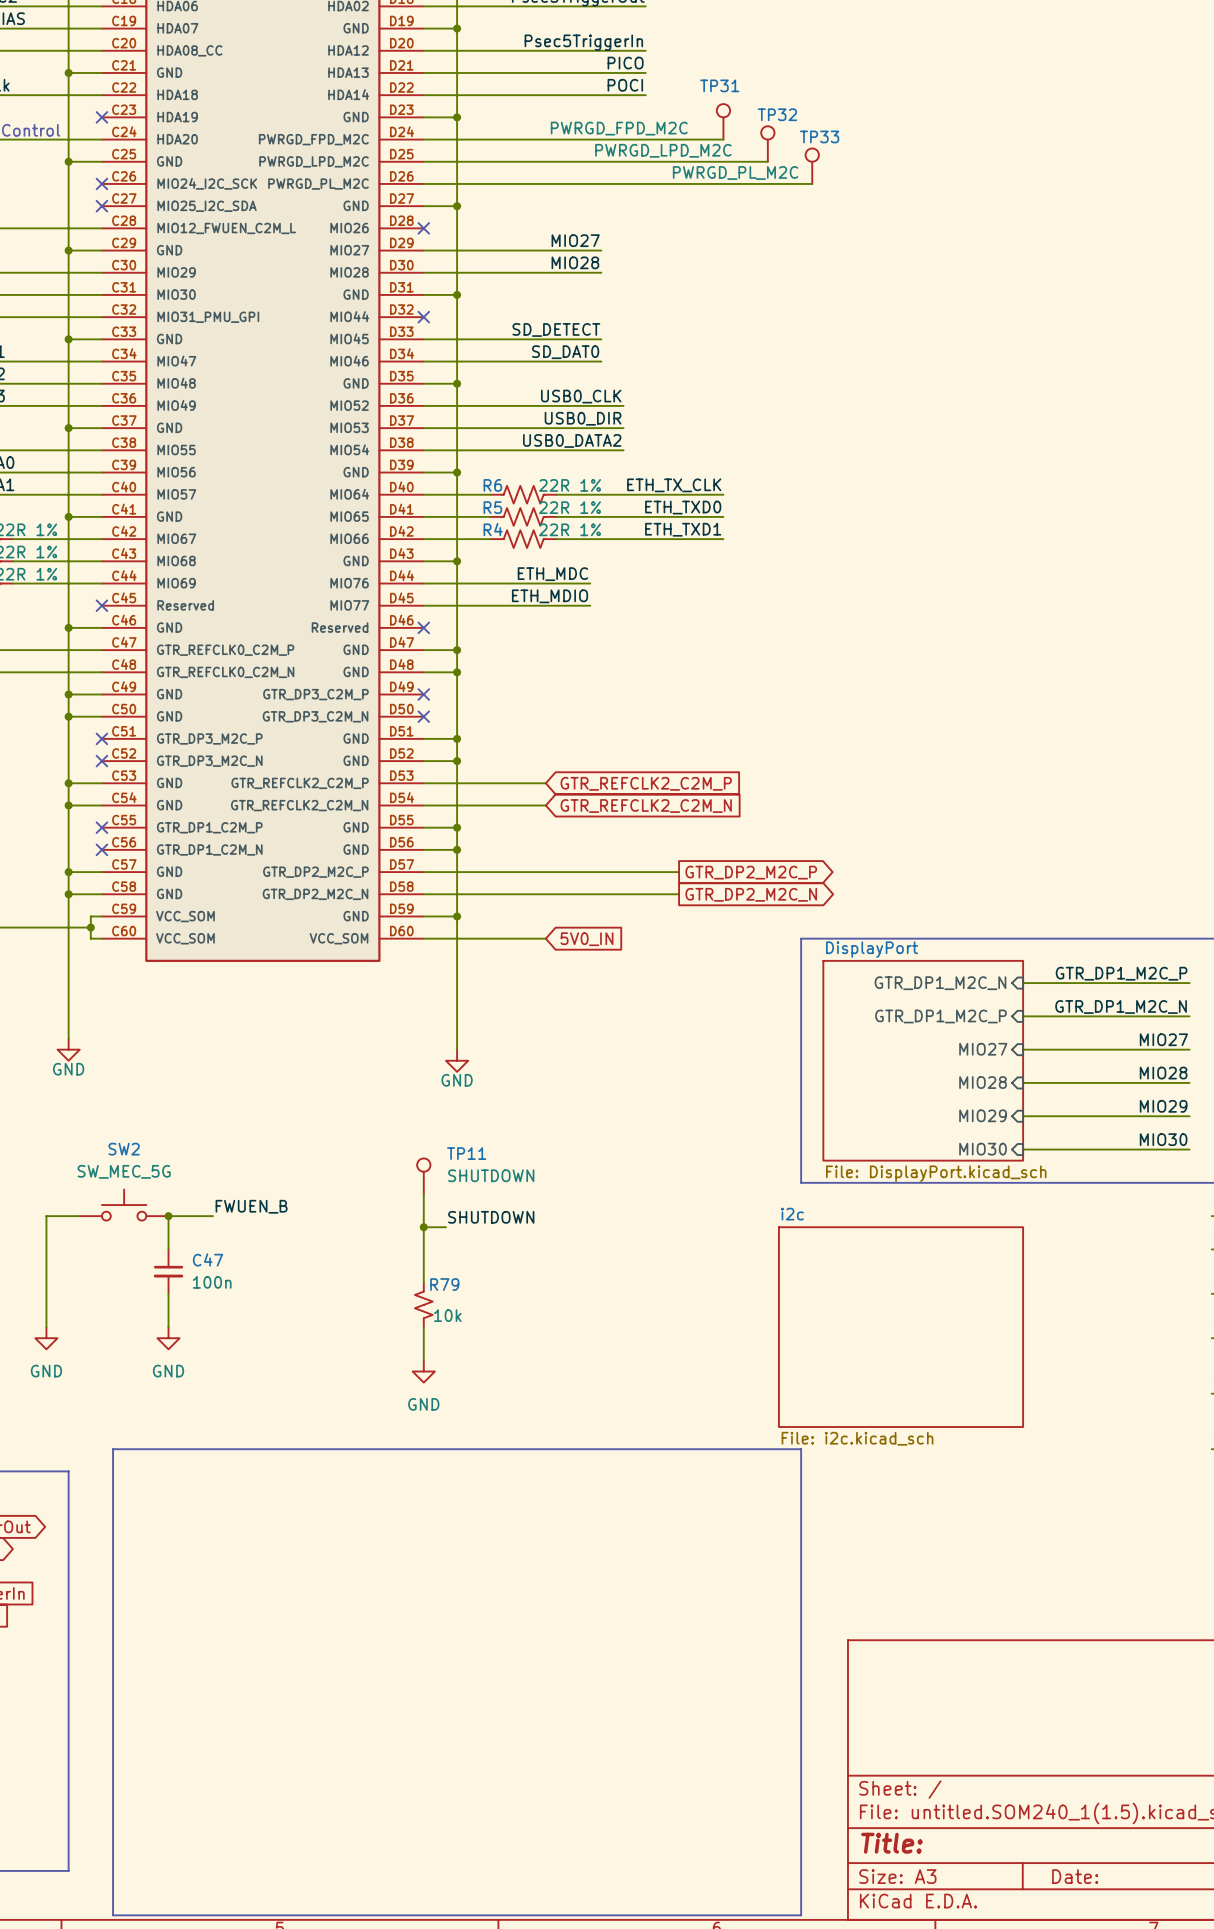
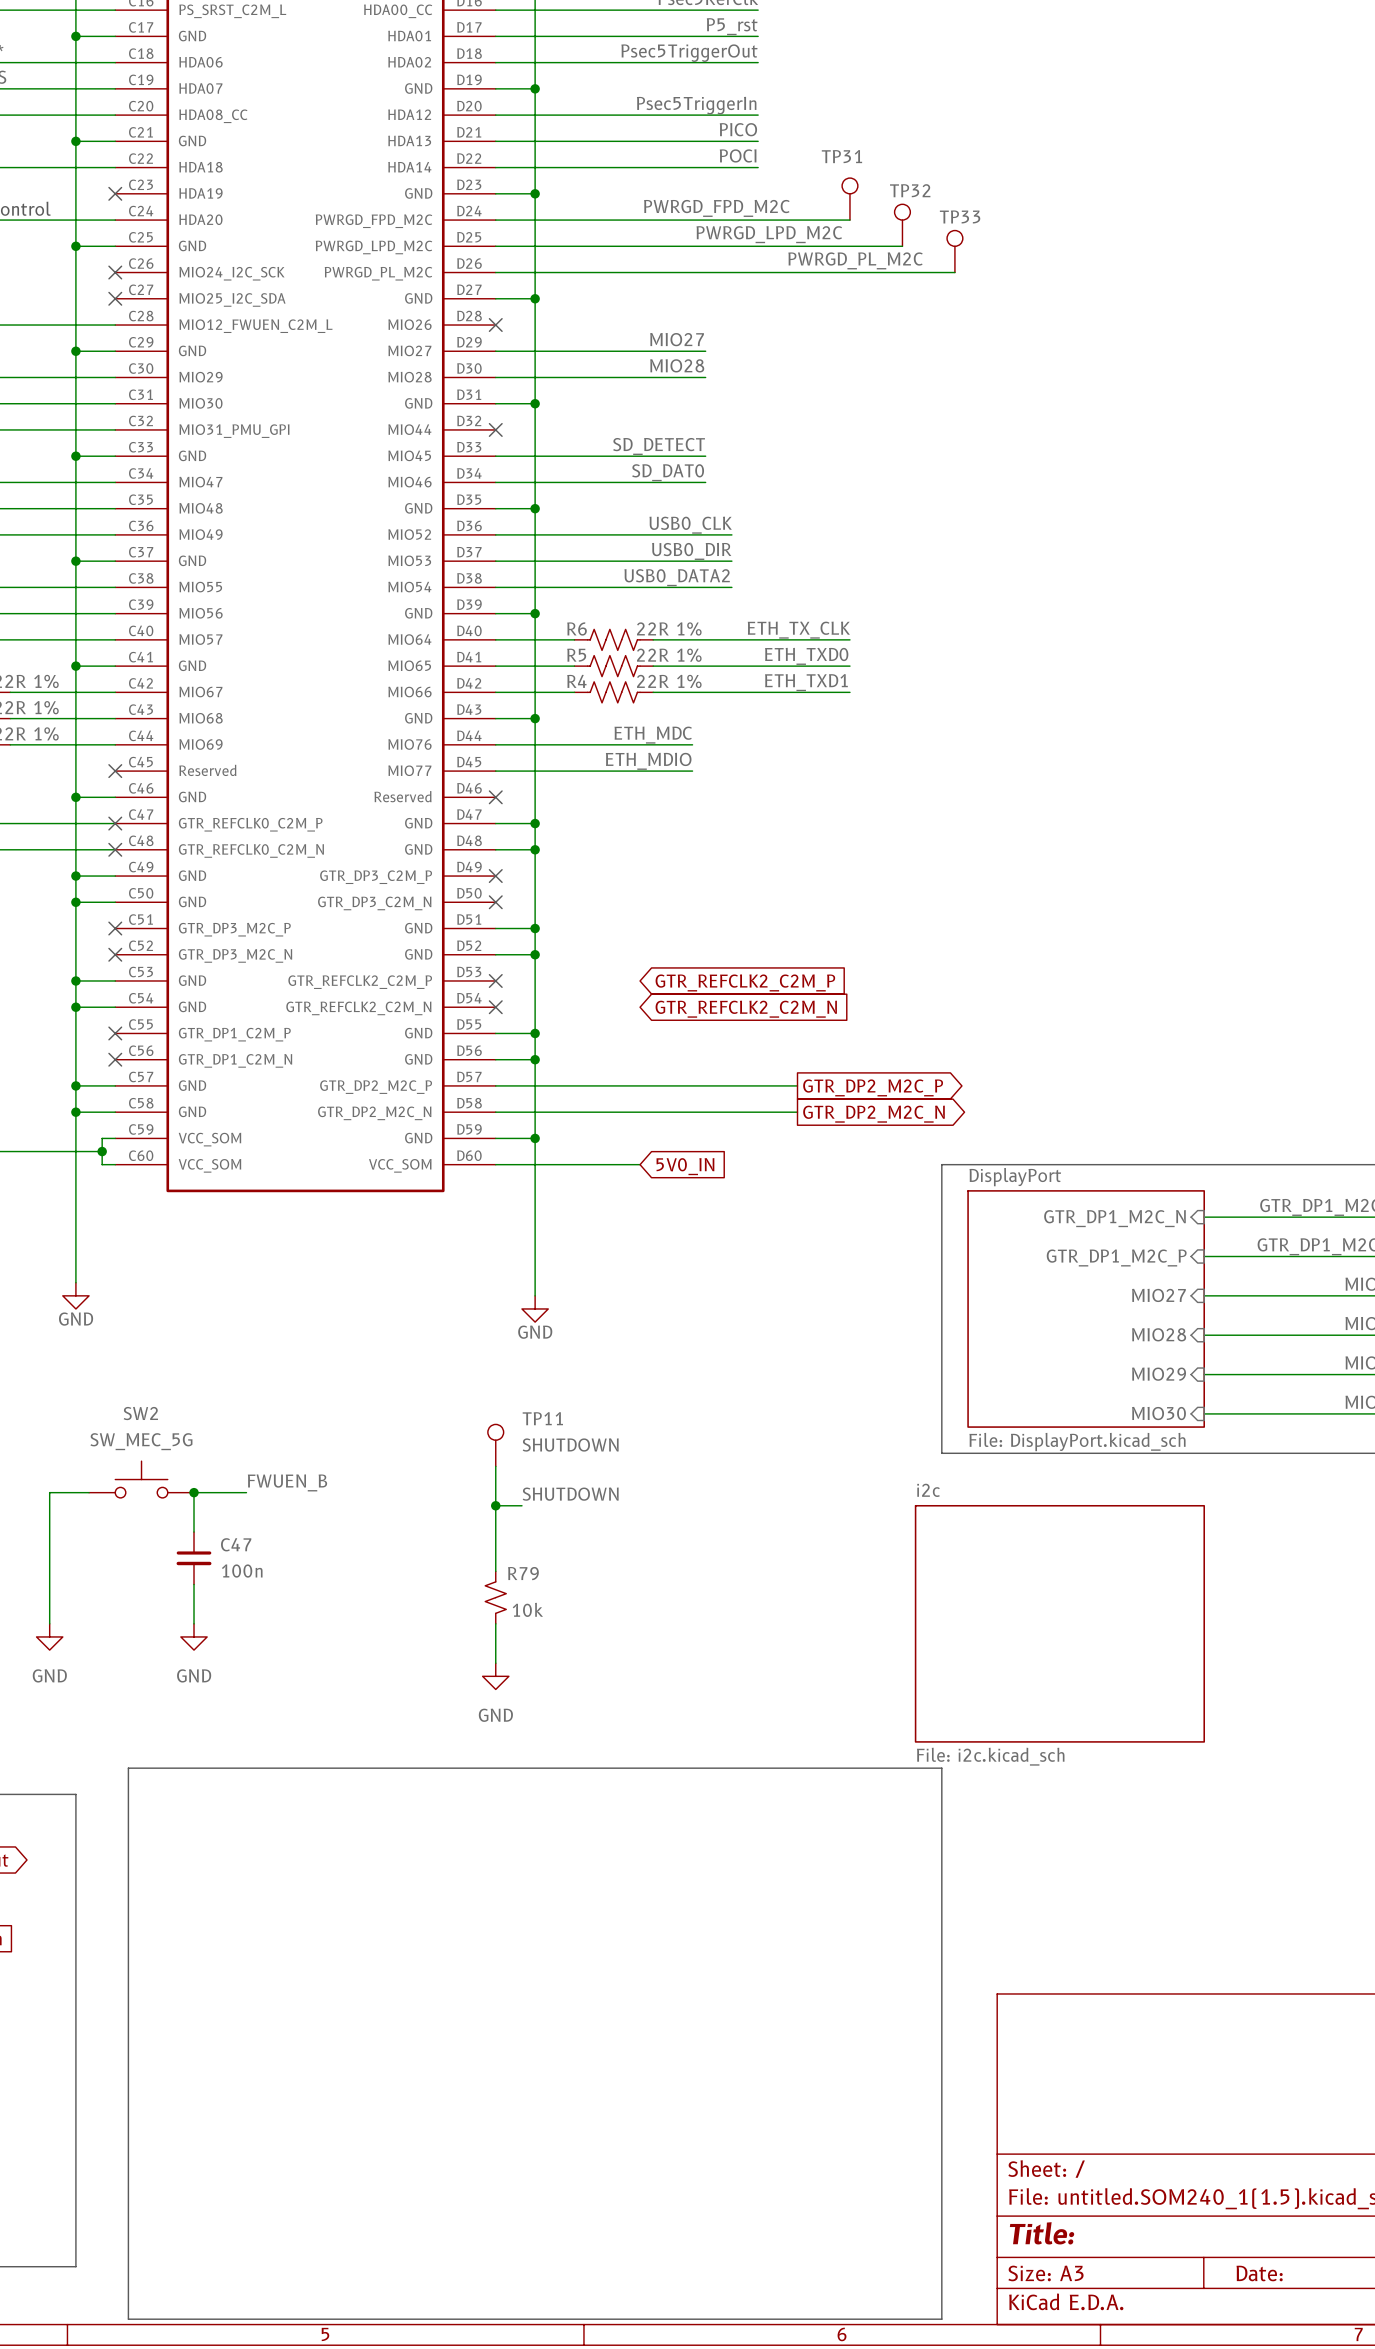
no-connect mark: none -> (115, 823)
no-connect mark: none -> (115, 849)
wire: (423, 783) (545, 783) -> none
no-connect mark: none -> (495, 980)
wire: (423, 805) (545, 805) -> none
no-connect mark: none -> (495, 1007)

